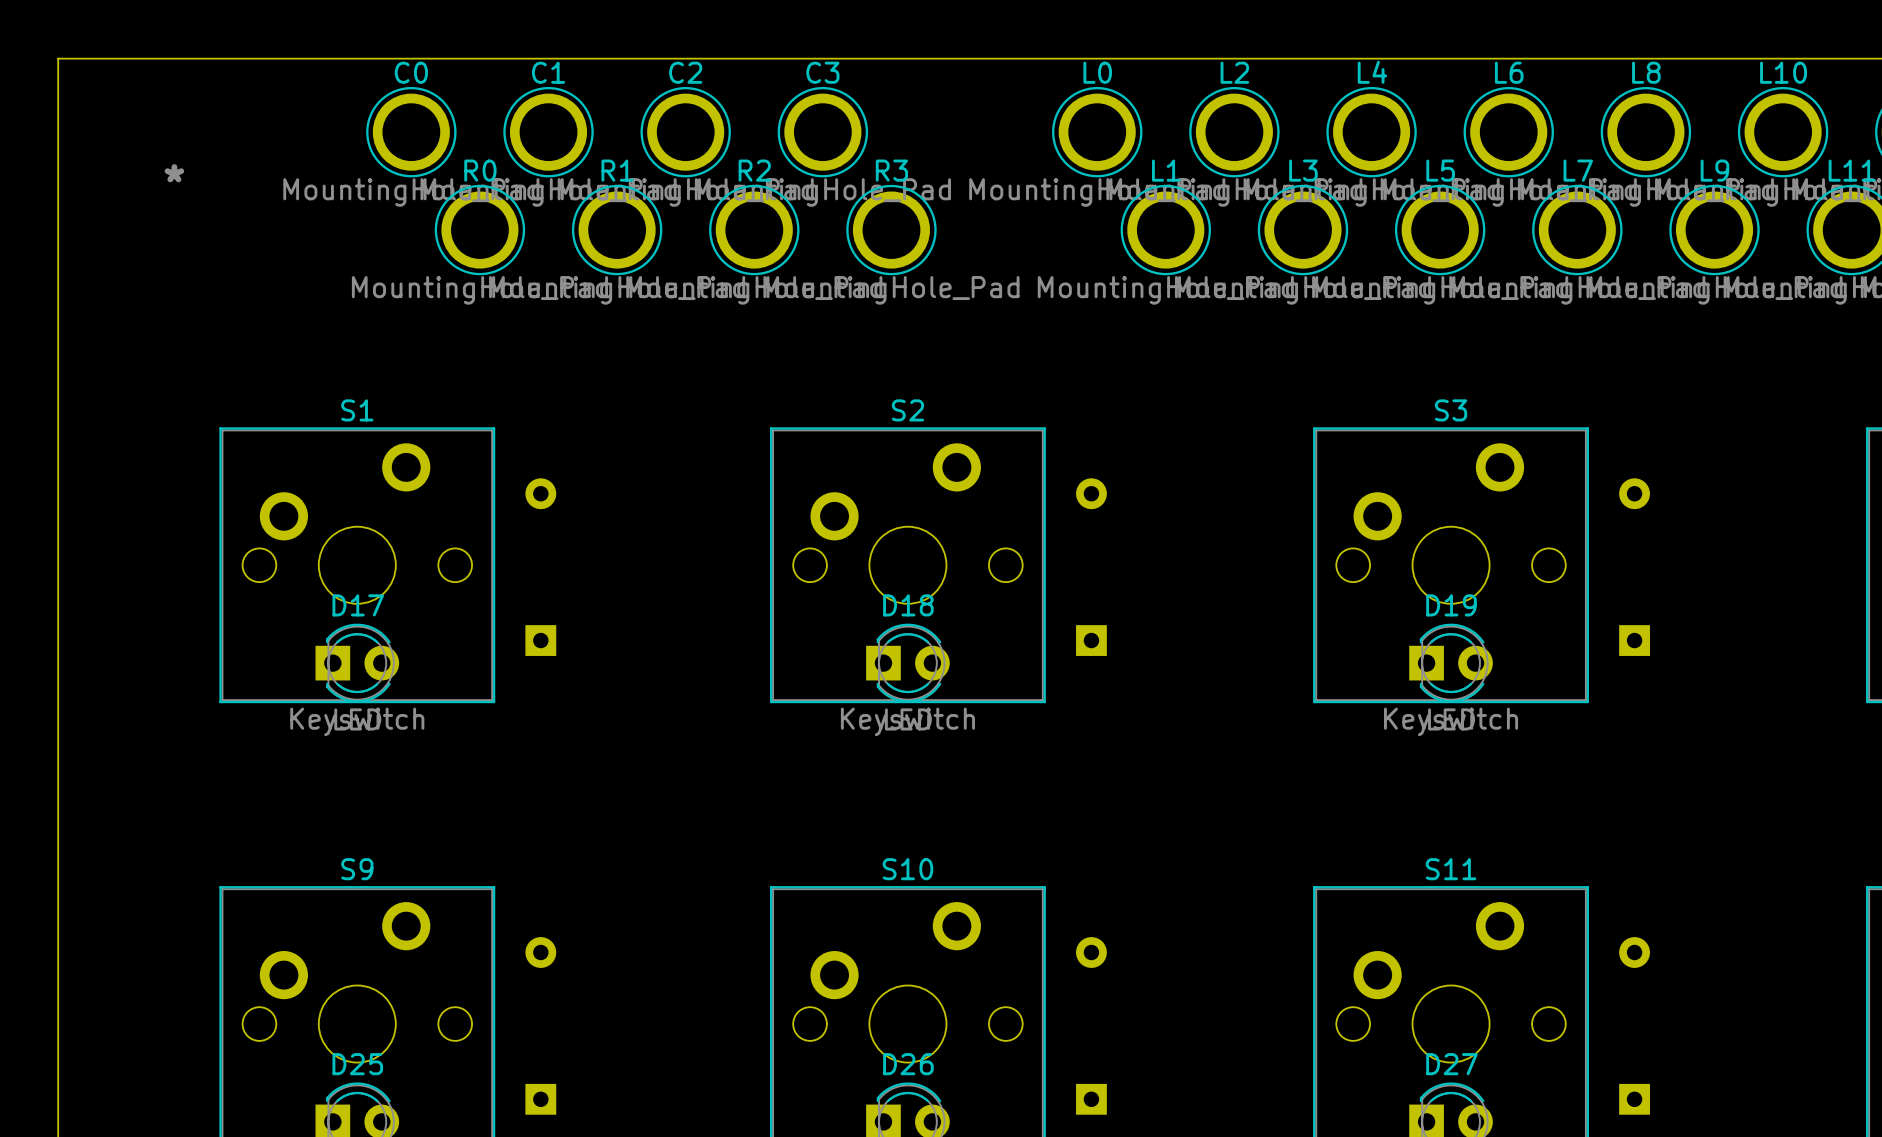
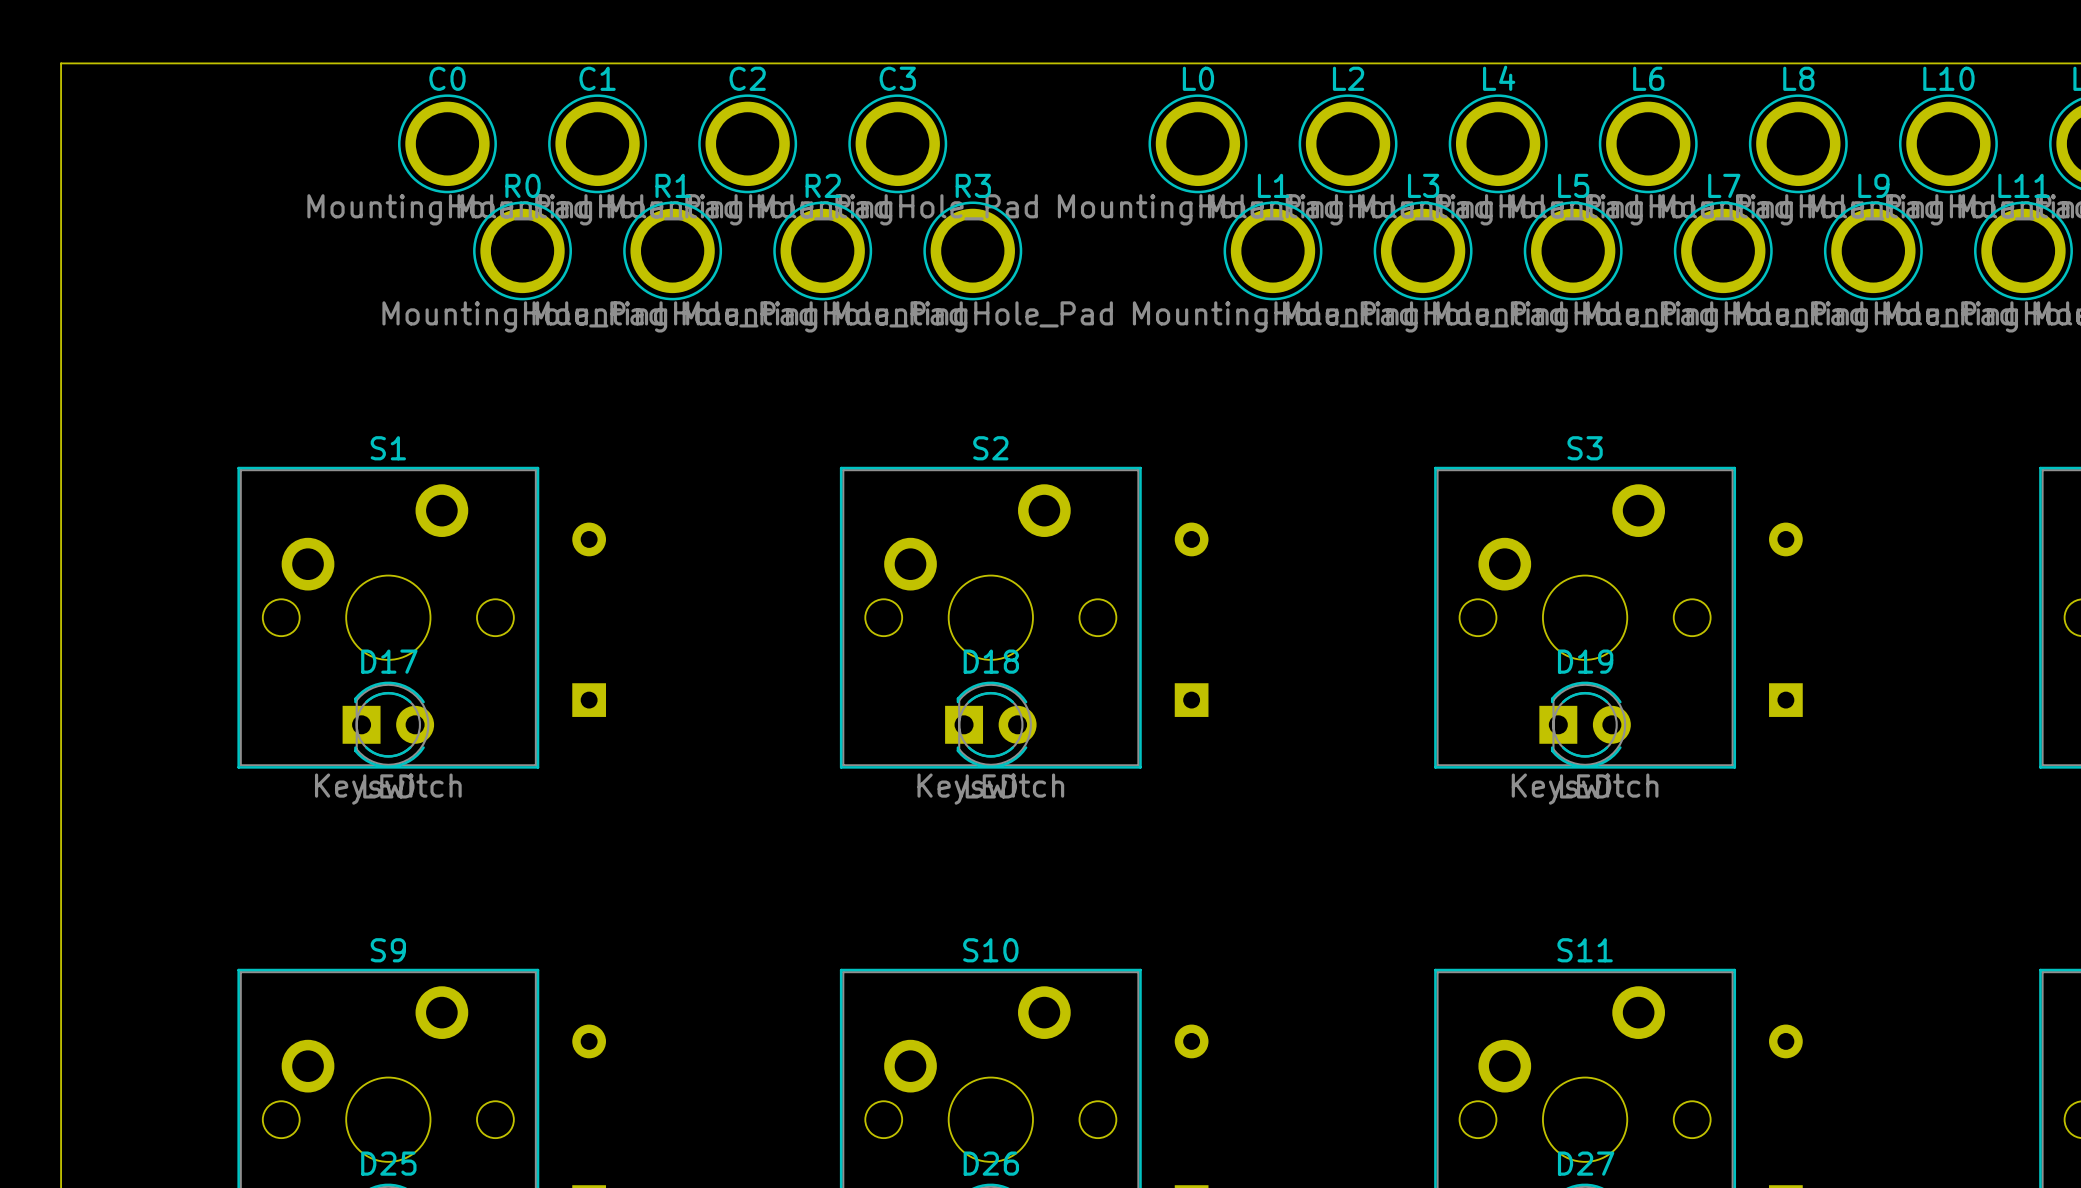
text: * (174, 173) -> none

